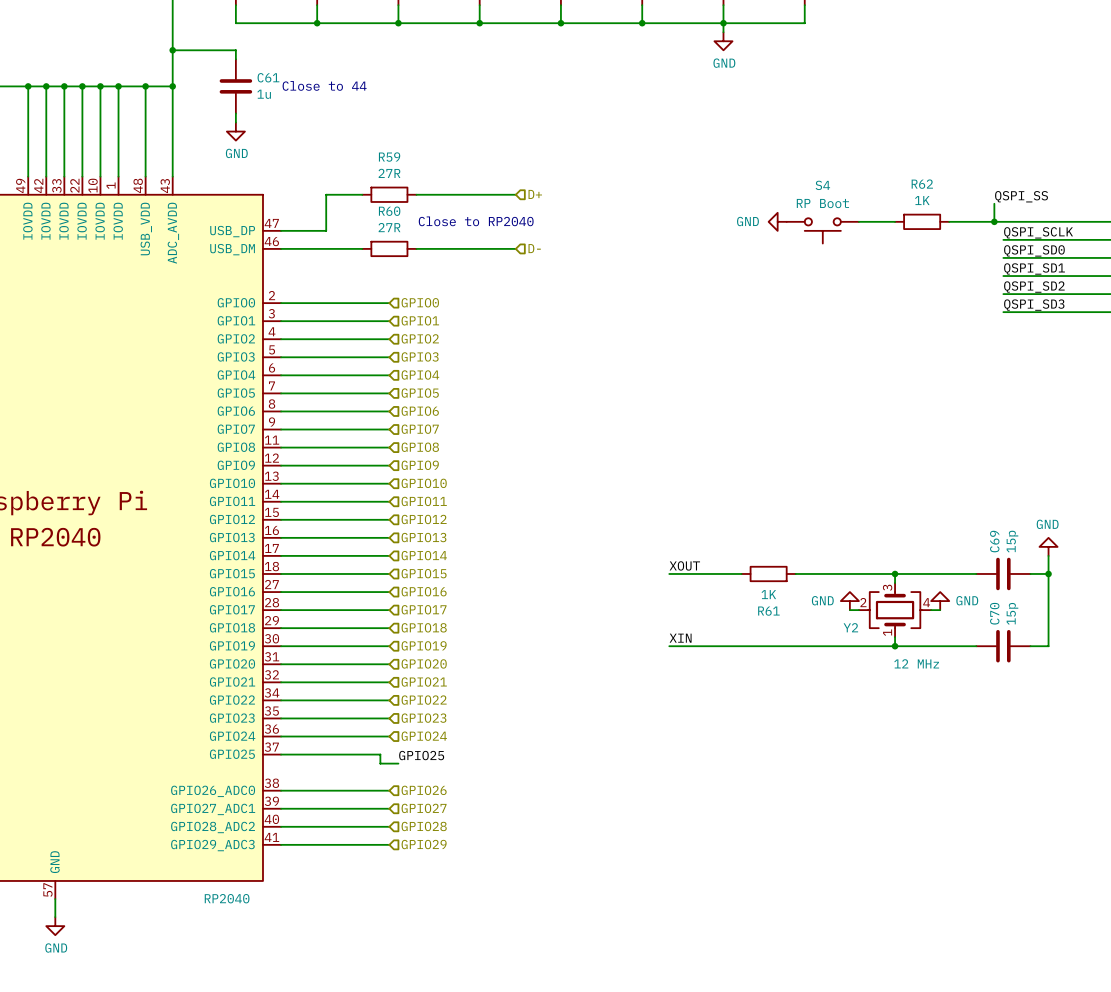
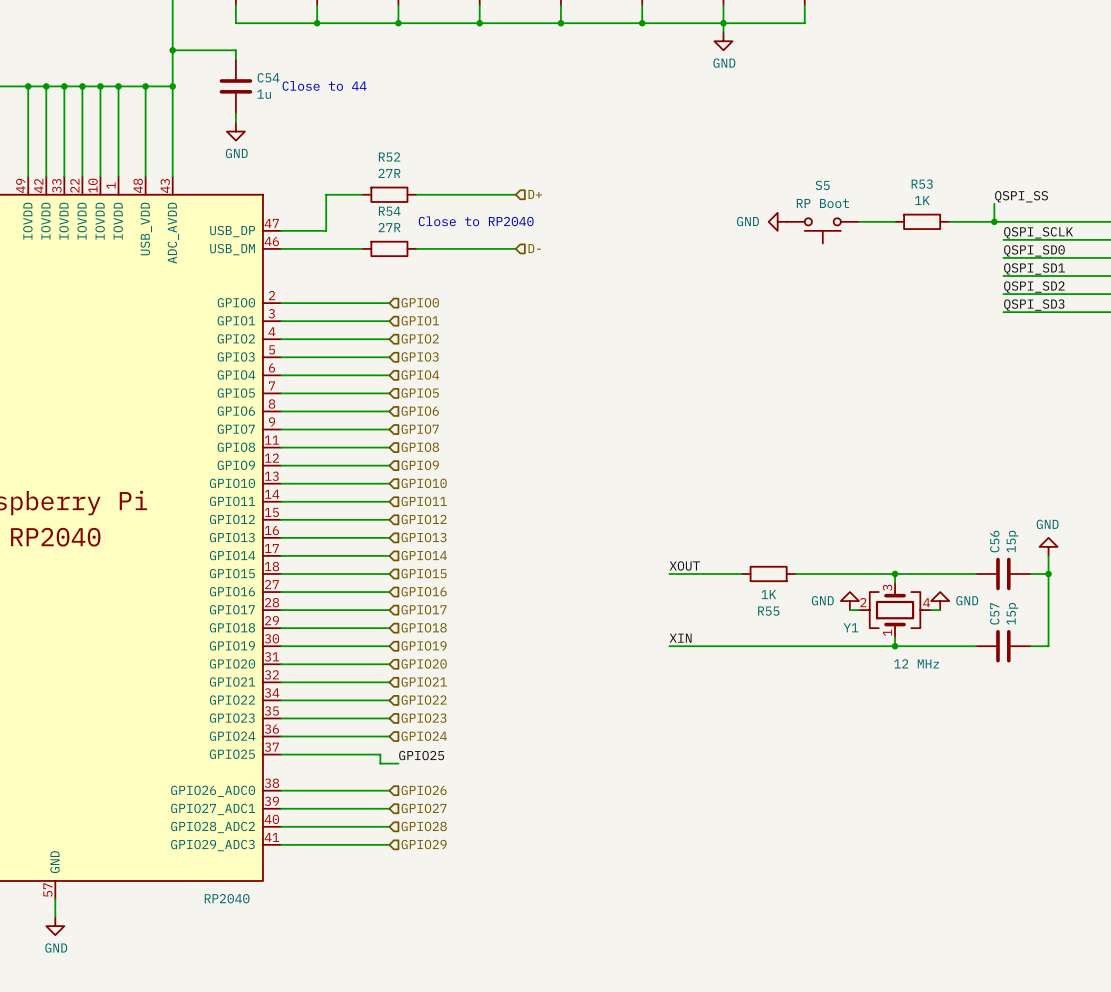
C61 name: C61 (268, 77) -> C54 (268, 77)
R59 name: R59 (389, 157) -> R52 (389, 157)
R62 name: R62 (922, 184) -> R53 (922, 184)
S4 name: S4 (822, 185) -> S5 (822, 185)
R60 name: R60 (389, 211) -> R54 (389, 211)
C69 name: C69 (994, 541) -> C56 (994, 541)
R61 name: R61 (768, 611) -> R55 (768, 611)
C70 name: C70 (994, 613) -> C57 (994, 613)
Y2 name: Y2 (850, 627) -> Y1 (850, 627)

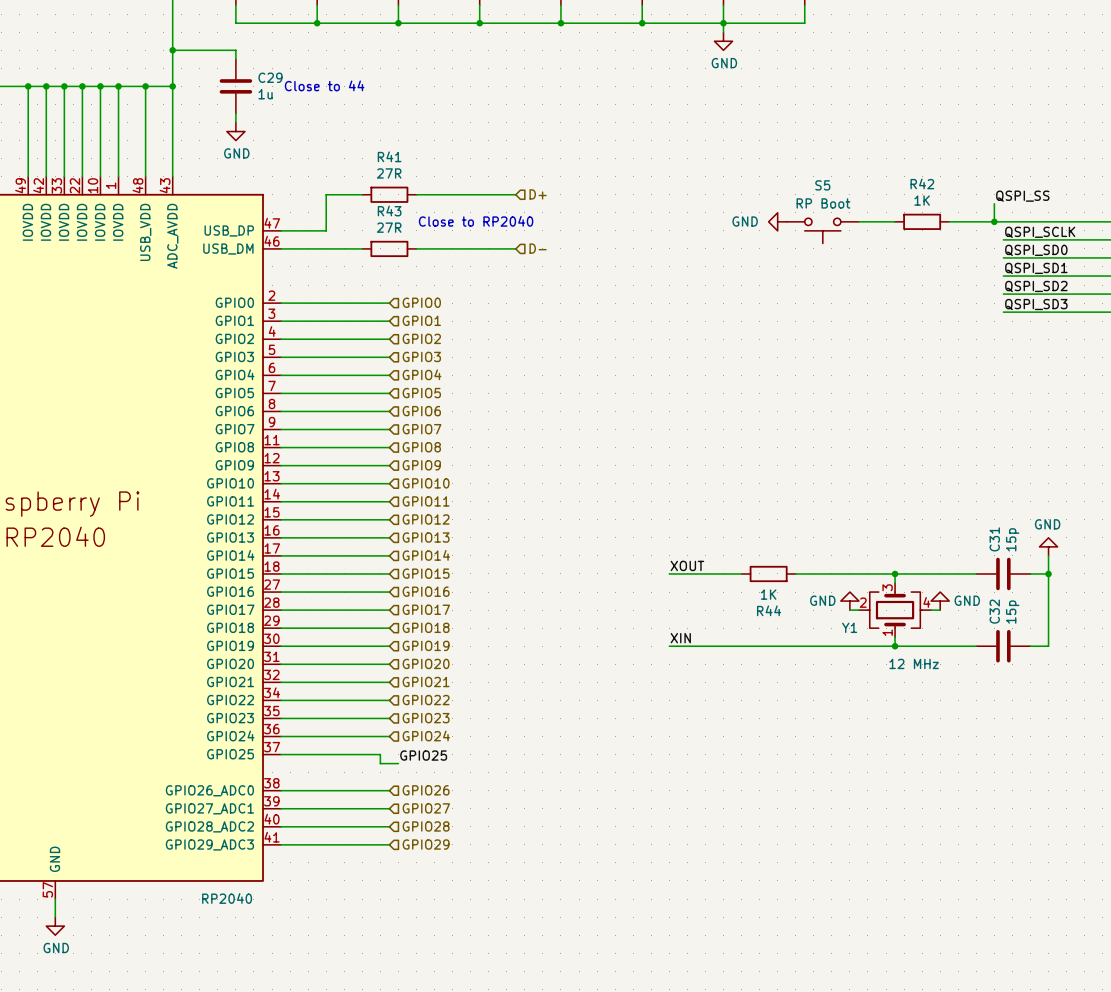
C54 name: C54 (268, 77) -> C29 (270, 77)
R52 name: R52 (389, 157) -> R41 (389, 156)
R53 name: R53 (922, 184) -> R42 (922, 183)
R54 name: R54 (389, 211) -> R43 (389, 211)
C56 name: C56 (994, 541) -> C31 (994, 539)
R55 name: R55 (768, 611) -> R44 (769, 610)
C57 name: C57 (994, 613) -> C32 (994, 611)

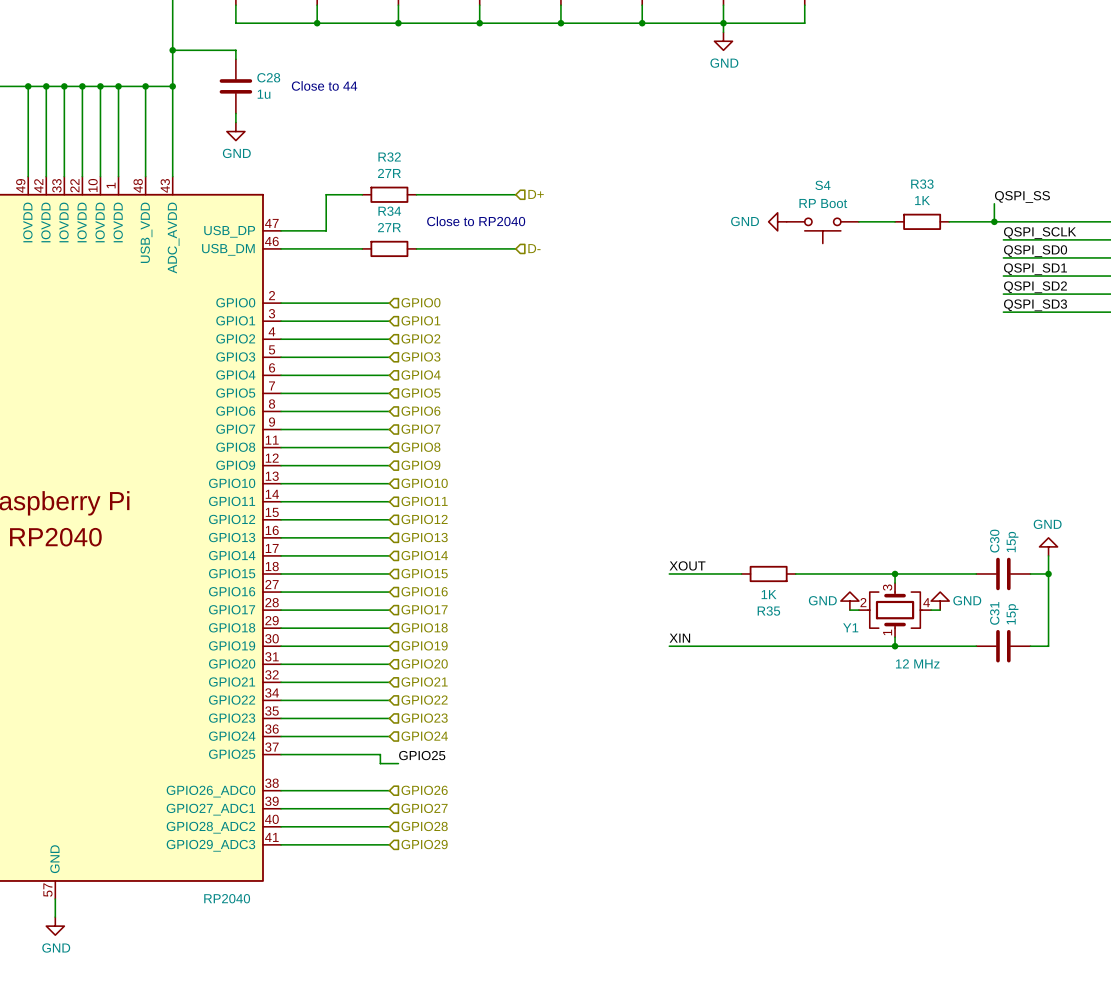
C29 name: C29 (270, 77) -> C28 (268, 77)
R41 name: R41 (389, 156) -> R32 (389, 157)
R42 name: R42 (922, 183) -> R33 (922, 184)
S5 name: S5 (822, 185) -> S4 (822, 185)
R43 name: R43 (389, 211) -> R34 (389, 211)
C31 name: C31 (994, 539) -> C30 (994, 541)
R44 name: R44 (769, 610) -> R35 (768, 611)
C32 name: C32 (994, 611) -> C31 (994, 613)

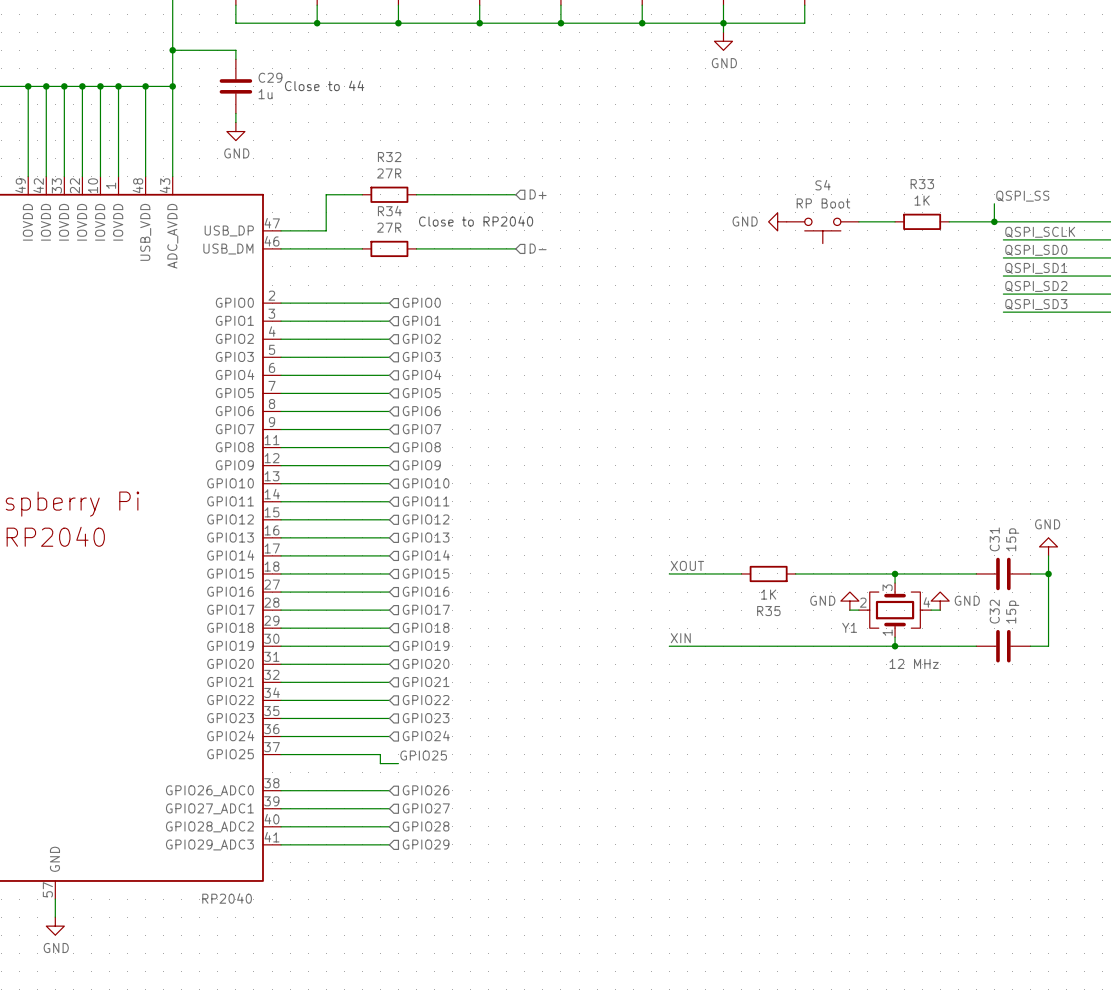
C28 name: C28 (268, 77) -> C29 (270, 77)
C30 name: C30 (994, 541) -> C31 (994, 539)
C31 name: C31 (994, 613) -> C32 (994, 611)

